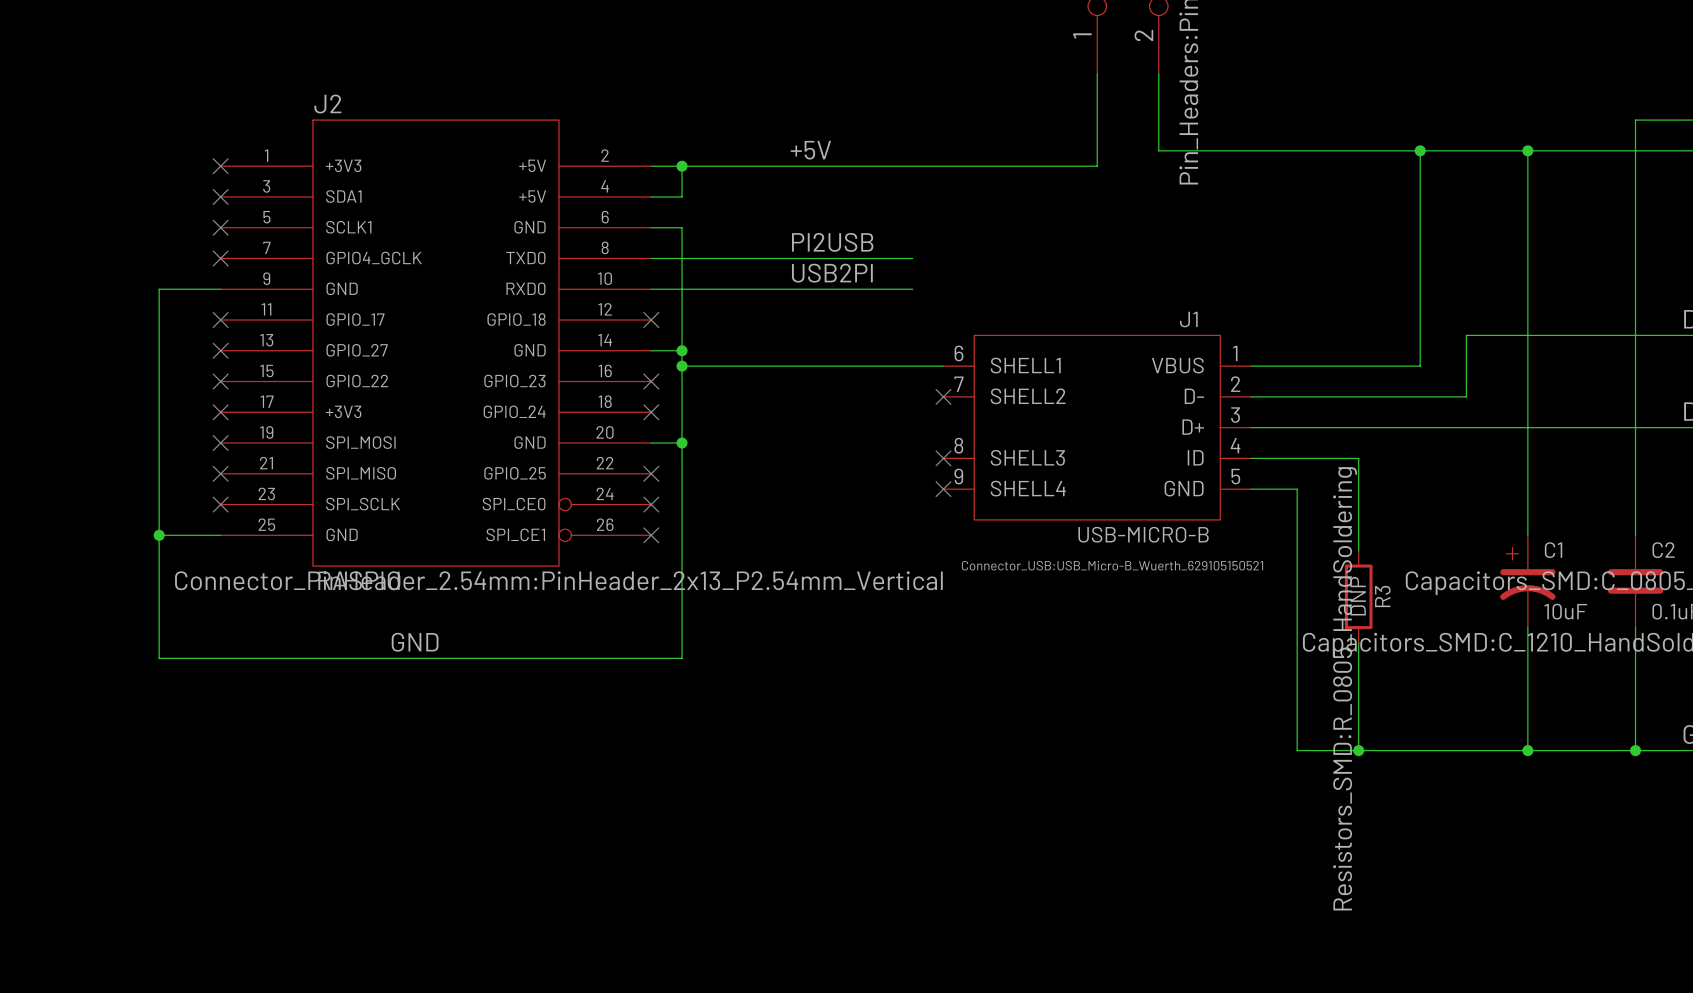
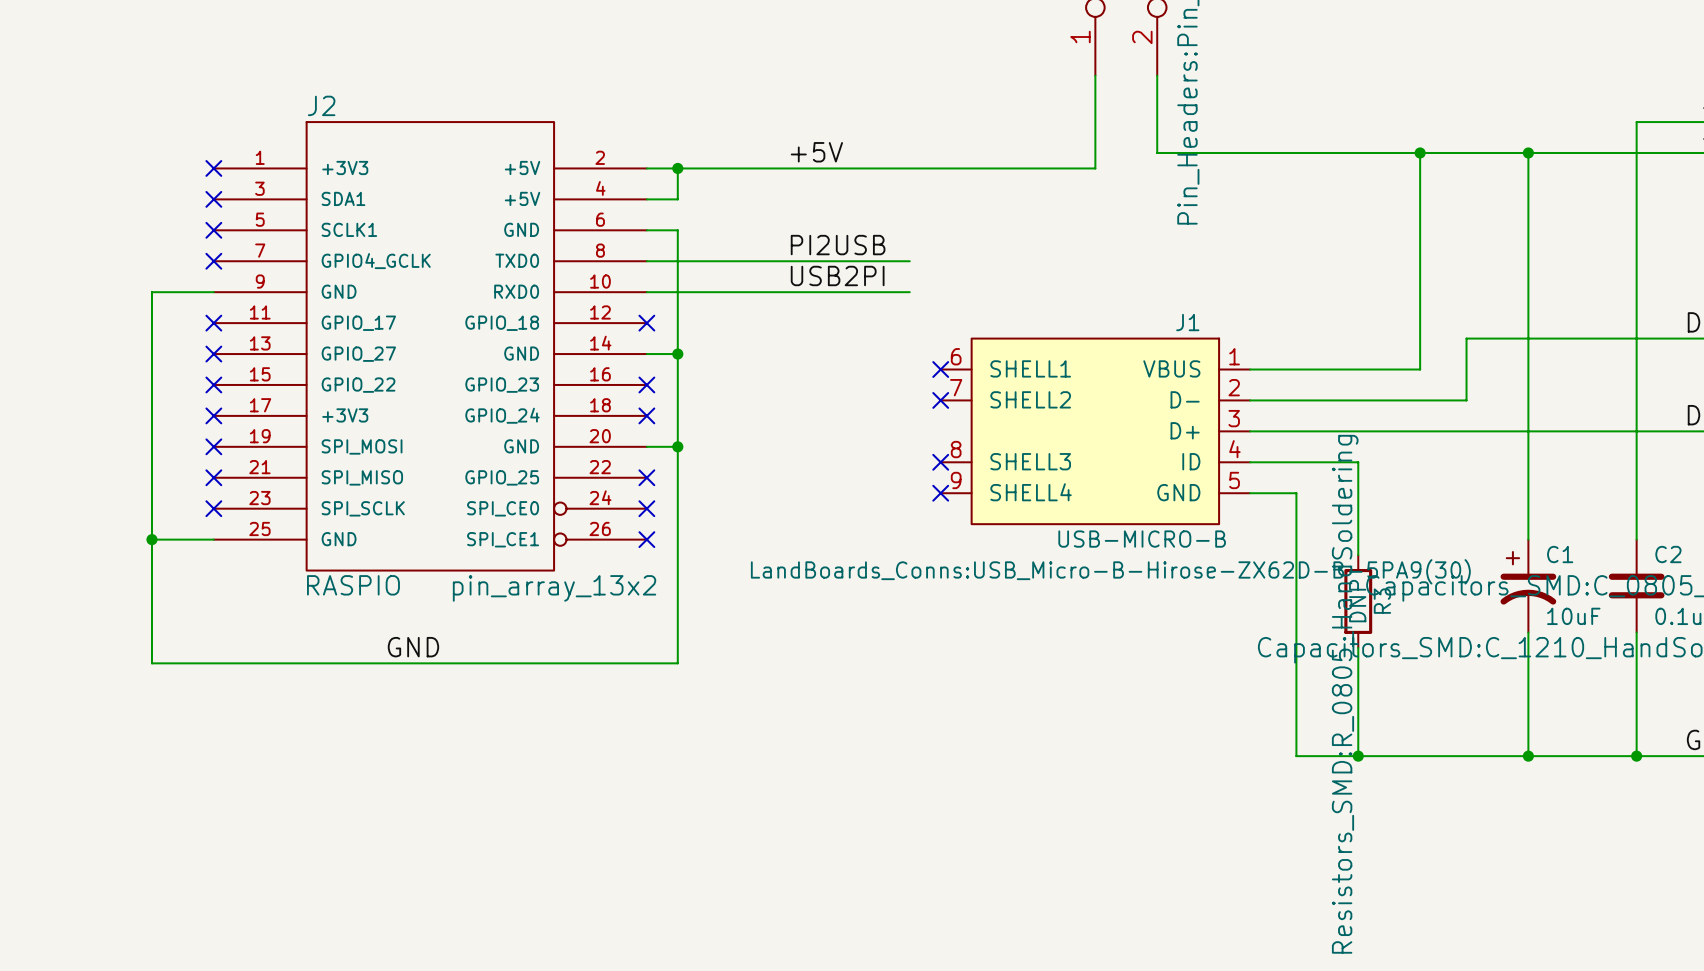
wire: (682, 366) (943, 366) -> none
junction: (682, 366) -> none
no-connect mark: none -> (940, 369)
J1 text: Connector_USB:USB_Micro-B_Wuerth_629105150521 (1112, 565) -> LandBoards_Conns:USB_Micro-B-Hirose-ZX62D-B-5PA9(30) (1110, 571)
J2 text: Connector_PinHeader_2.54mm:PinHeader_2x13_P2.54mm_Vertical (558, 580) -> pin_array_13x2 (554, 588)

